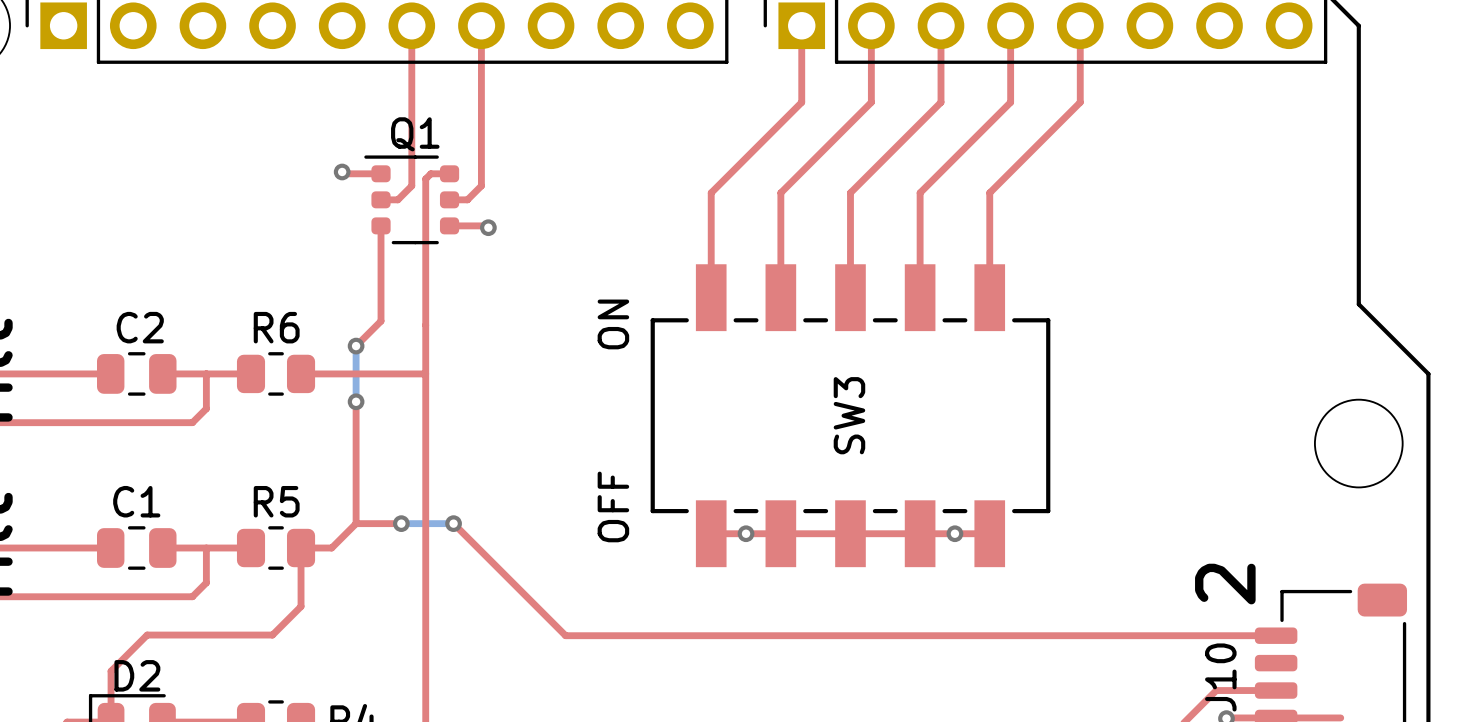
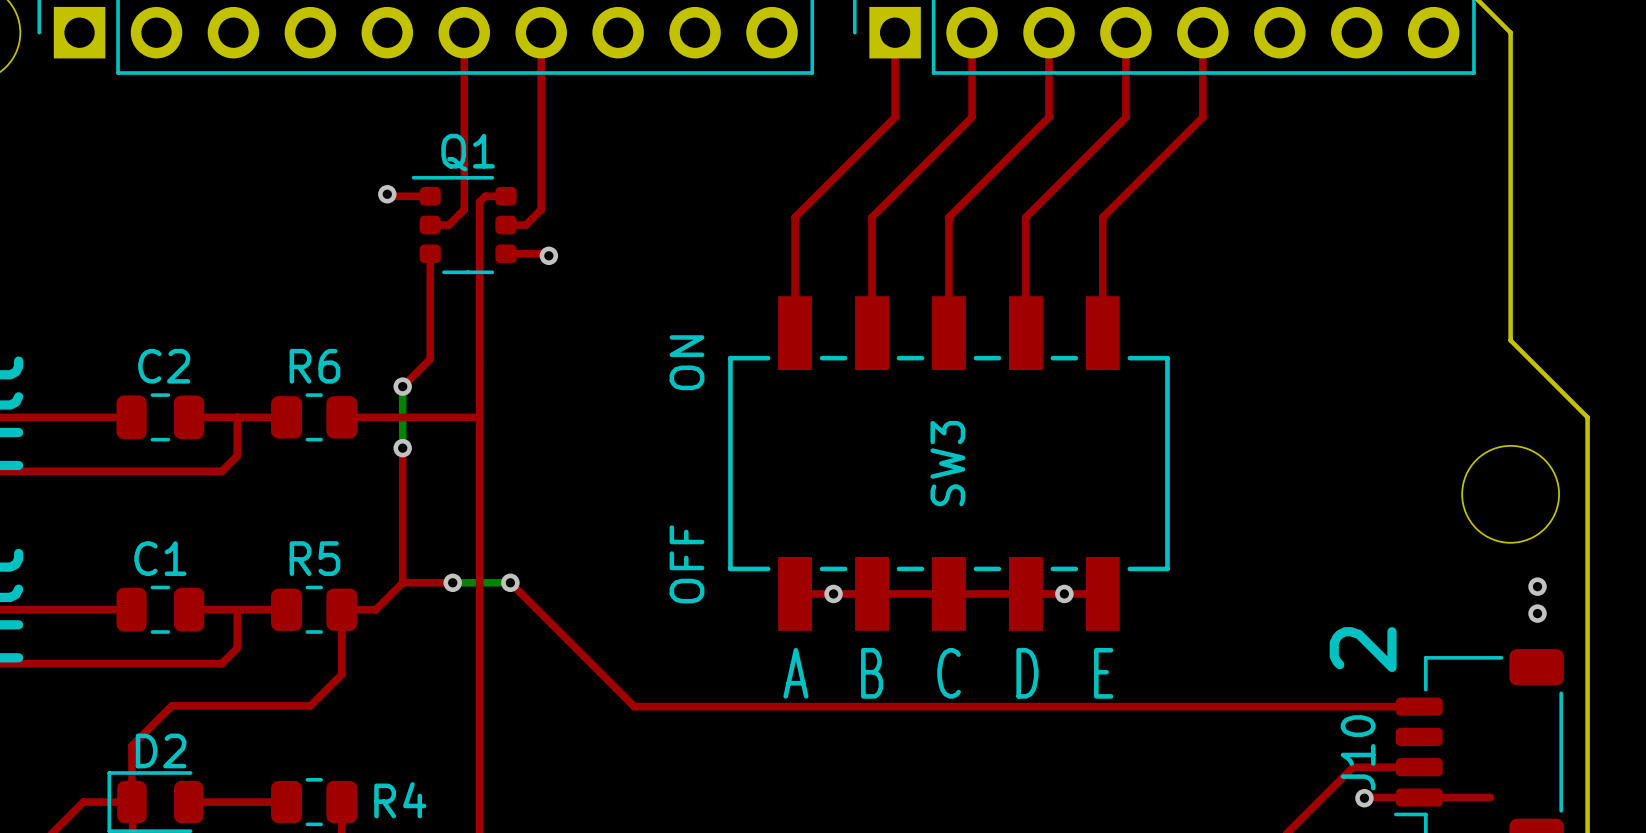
via: none -> (1537, 586)
via: none -> (1537, 613)
text: none -> A B C D E (948, 673)

